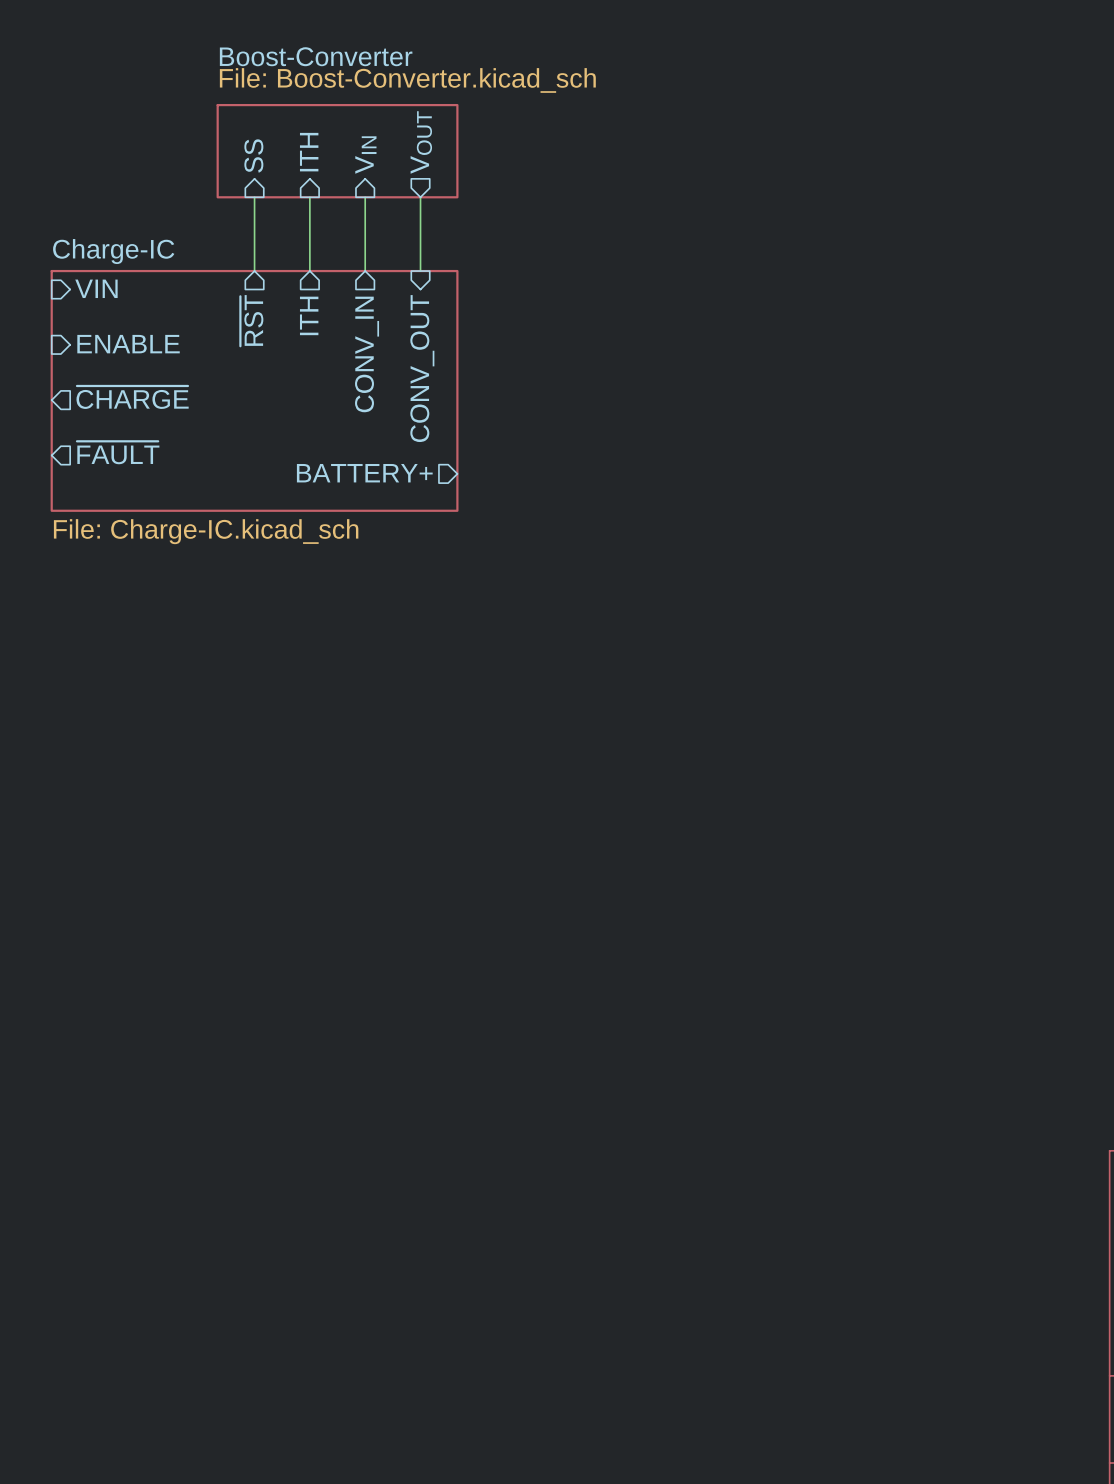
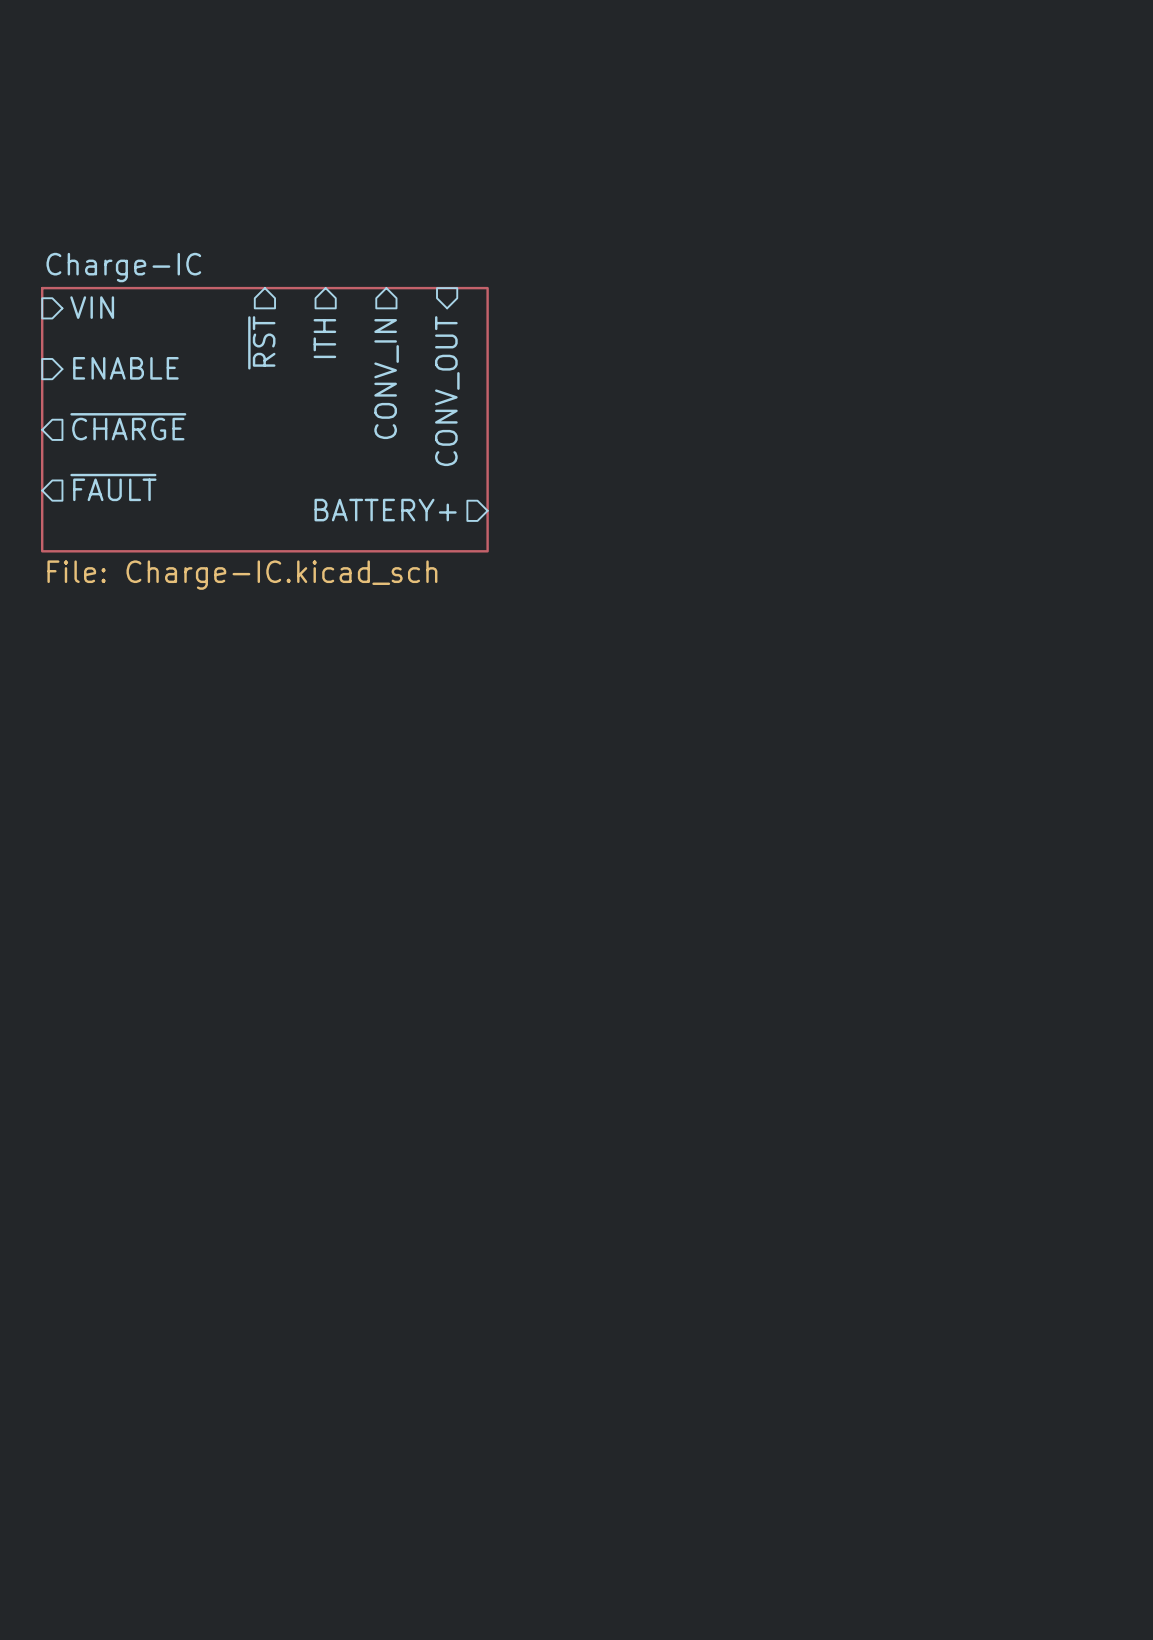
sheet pin: VOUT (421, 142) -> none
sheet Boost-Converter: File: Boost-Converter.kicad_sch (337, 151) -> none
sheet pin: ITH (309, 152) -> none
sheet pin: VIN (365, 155) -> none
sheet pin: SS (253, 156) -> none
wire: (254, 197) (254, 271) -> none
wire: (309, 197) (309, 271) -> none
wire: (365, 197) (365, 271) -> none
wire: (420, 197) (420, 271) -> none

